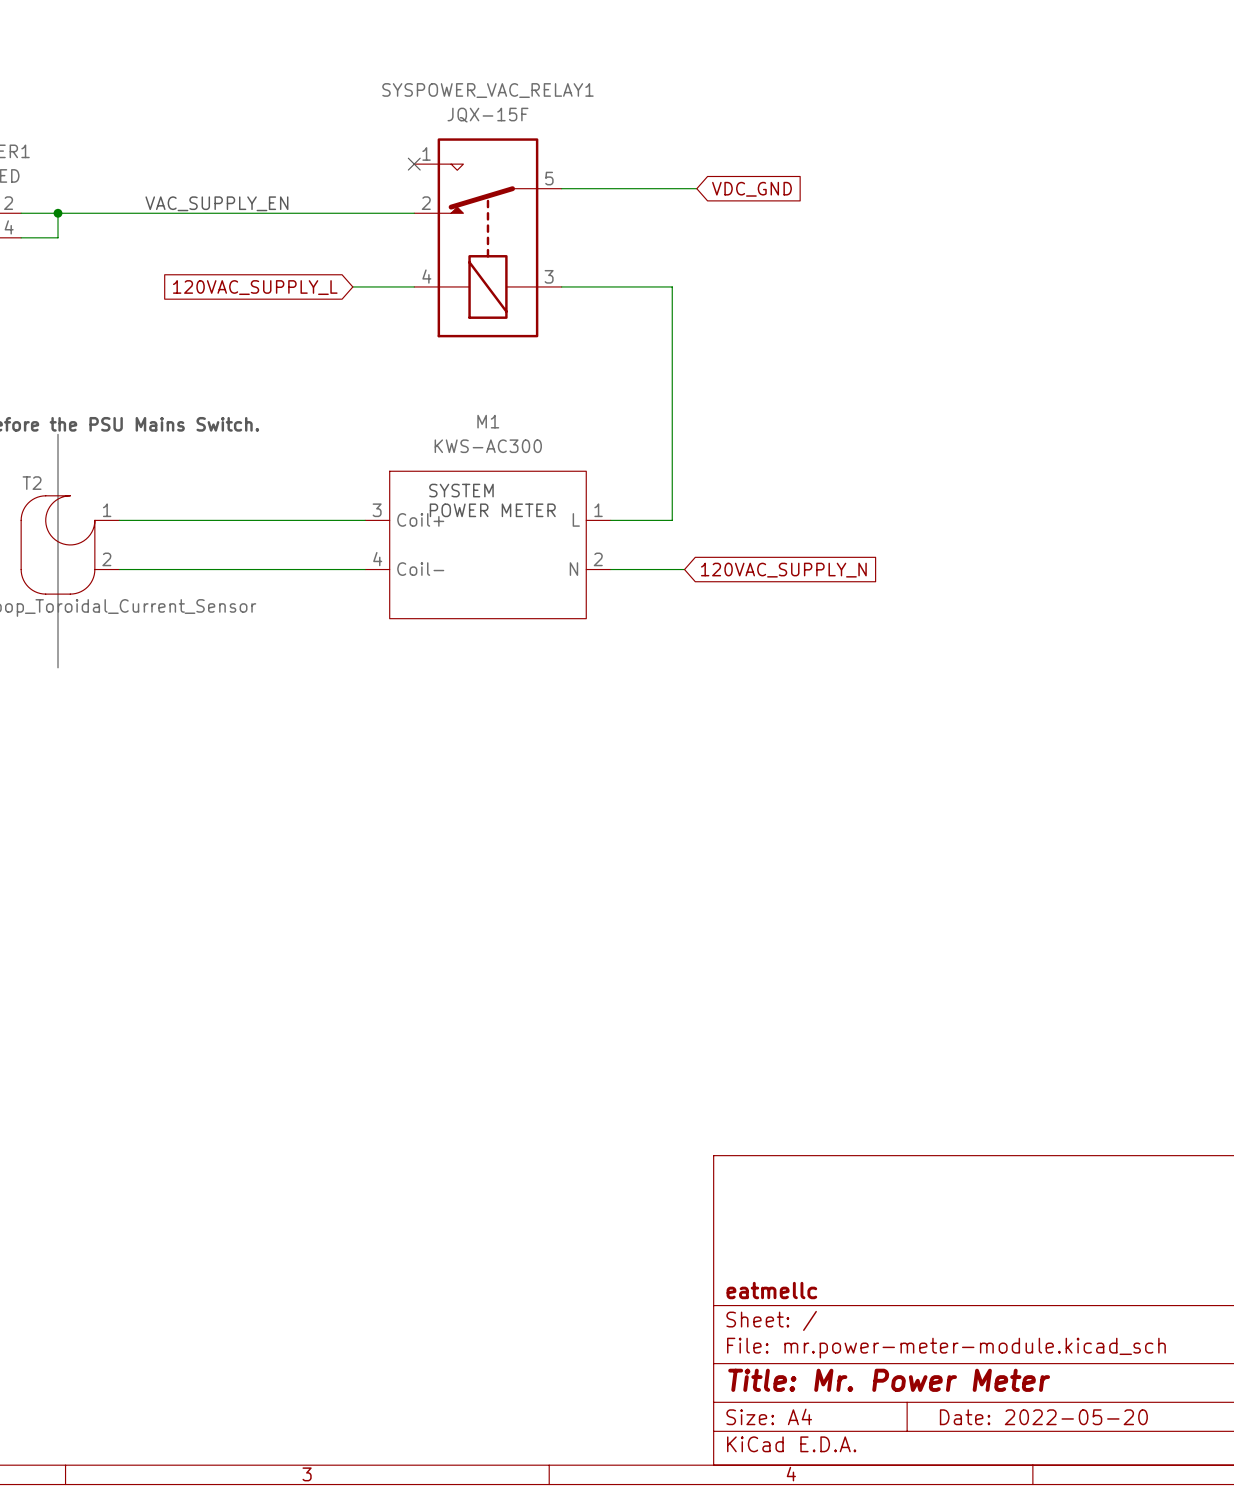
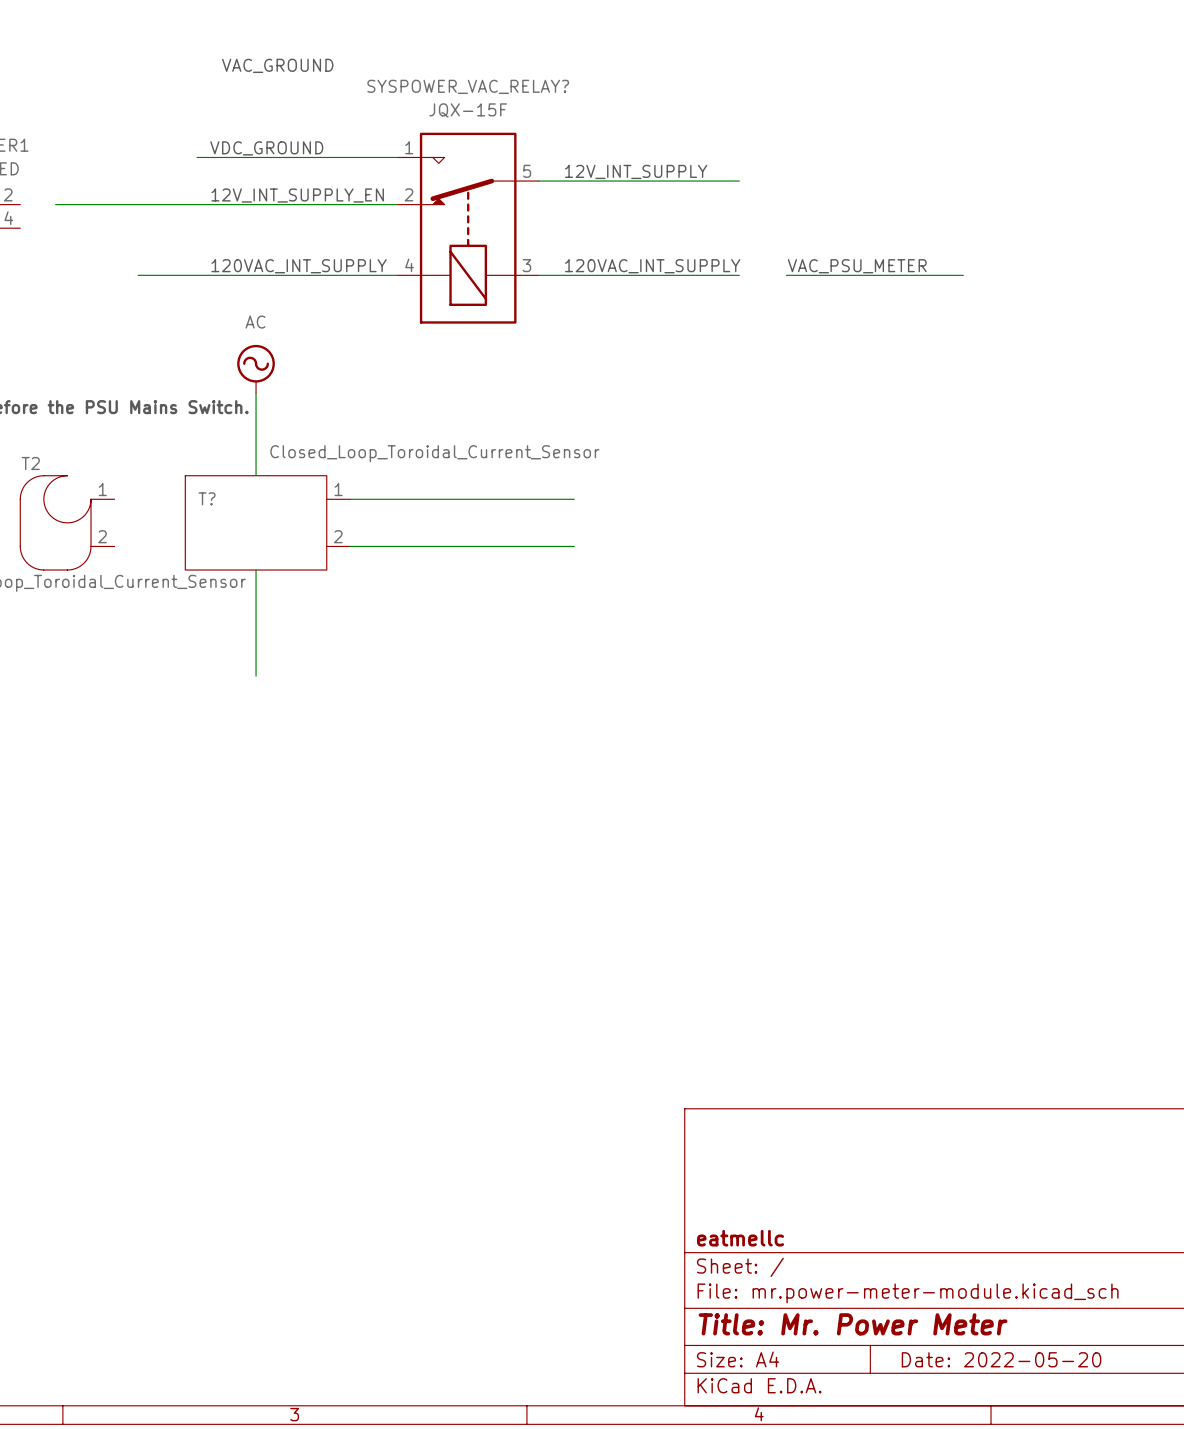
text: none -> VAC_GROUND (277, 65)
SYSPOWER_VAC_RELAY1 name: SYSPOWER_VAC_RELAY1 (487, 90) -> SYSPOWER_VAC_RELAY? (468, 86)
text: none -> VDC_GROUND (266, 148)
wire: none -> (197, 157) (397, 157)
no-connect mark: (414, 164) -> none
text: none -> 12V_INT_SUPPLY (636, 171)
wire: none -> (668, 181) (739, 181)
global label: VDC_GND (751, 189) -> none
text: VAC_SUPPLY_EN (216, 203) -> 12V_INT_SUPPLY_EN (297, 195)
wire: (21, 213) (58, 213) (58, 237) (21, 237) -> none
junction: (58, 213) -> none
text: none -> 120VAC_INT_SUPPLY (299, 266)
text: none -> 120VAC_INT_SUPPLY (652, 266)
text: none -> VAC_PSU_METER (857, 266)
wire: none -> (138, 275) (338, 275)
wire: (672, 286) (672, 520) (610, 520) -> (645, 275) (739, 275)
wire: none -> (786, 275) (963, 275)
global label: 120VAC_SUPPLY_L (255, 287) -> none
power symbol: none -> AC (256, 369)
wire: none -> (256, 393) (256, 475)
line: (58, 434) (58, 667) -> none
text: SYSTEM (461, 490) -> none
text: POWER METER (492, 510) -> none
wire: (119, 520) (365, 520) -> (574, 499) (350, 499)
T?: none -> Closed_Loop_Toroidal_Current_Sensor (350, 511)
M1: KWS-AC300 (487, 544) -> none
wire: (119, 569) (365, 569) -> (574, 546) (350, 546)
wire: (610, 569) (684, 569) -> none
global label: 120VAC_SUPPLY_N (783, 570) -> none
wire: none -> (256, 570) (256, 676)

